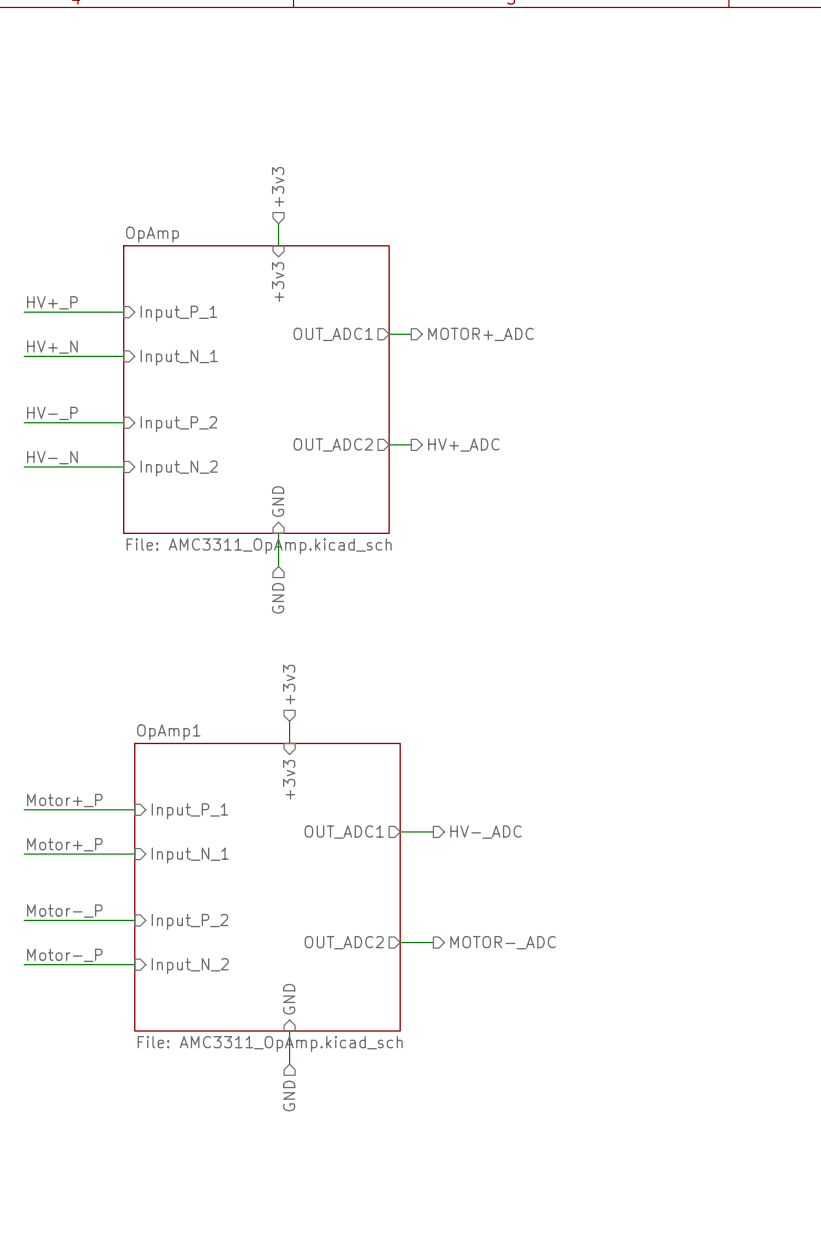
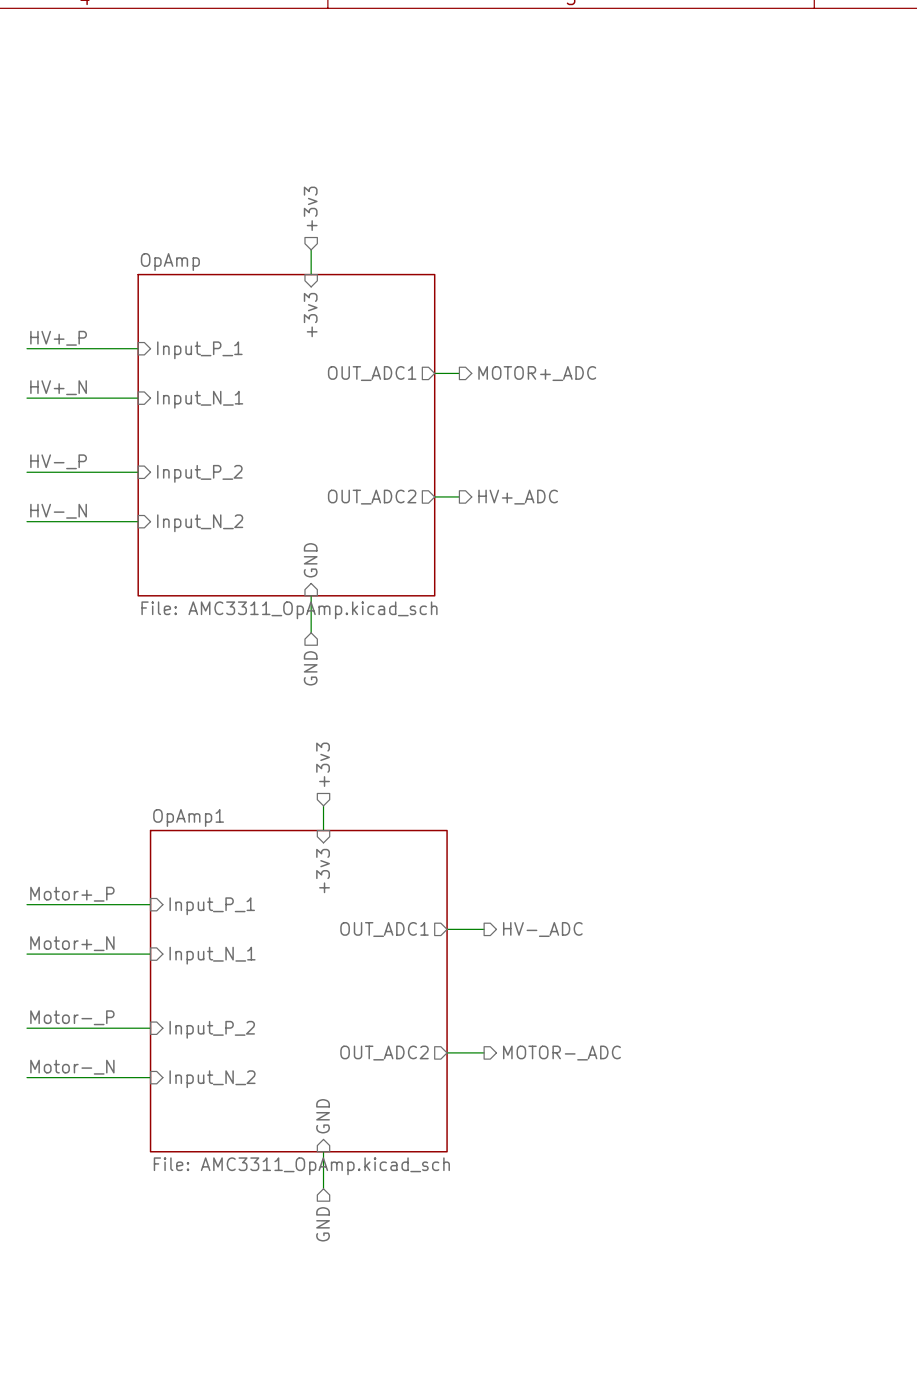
label: Motor+_P (64, 844) -> Motor+_N (72, 943)
label: Motor-_P (64, 955) -> Motor-_N (72, 1067)

